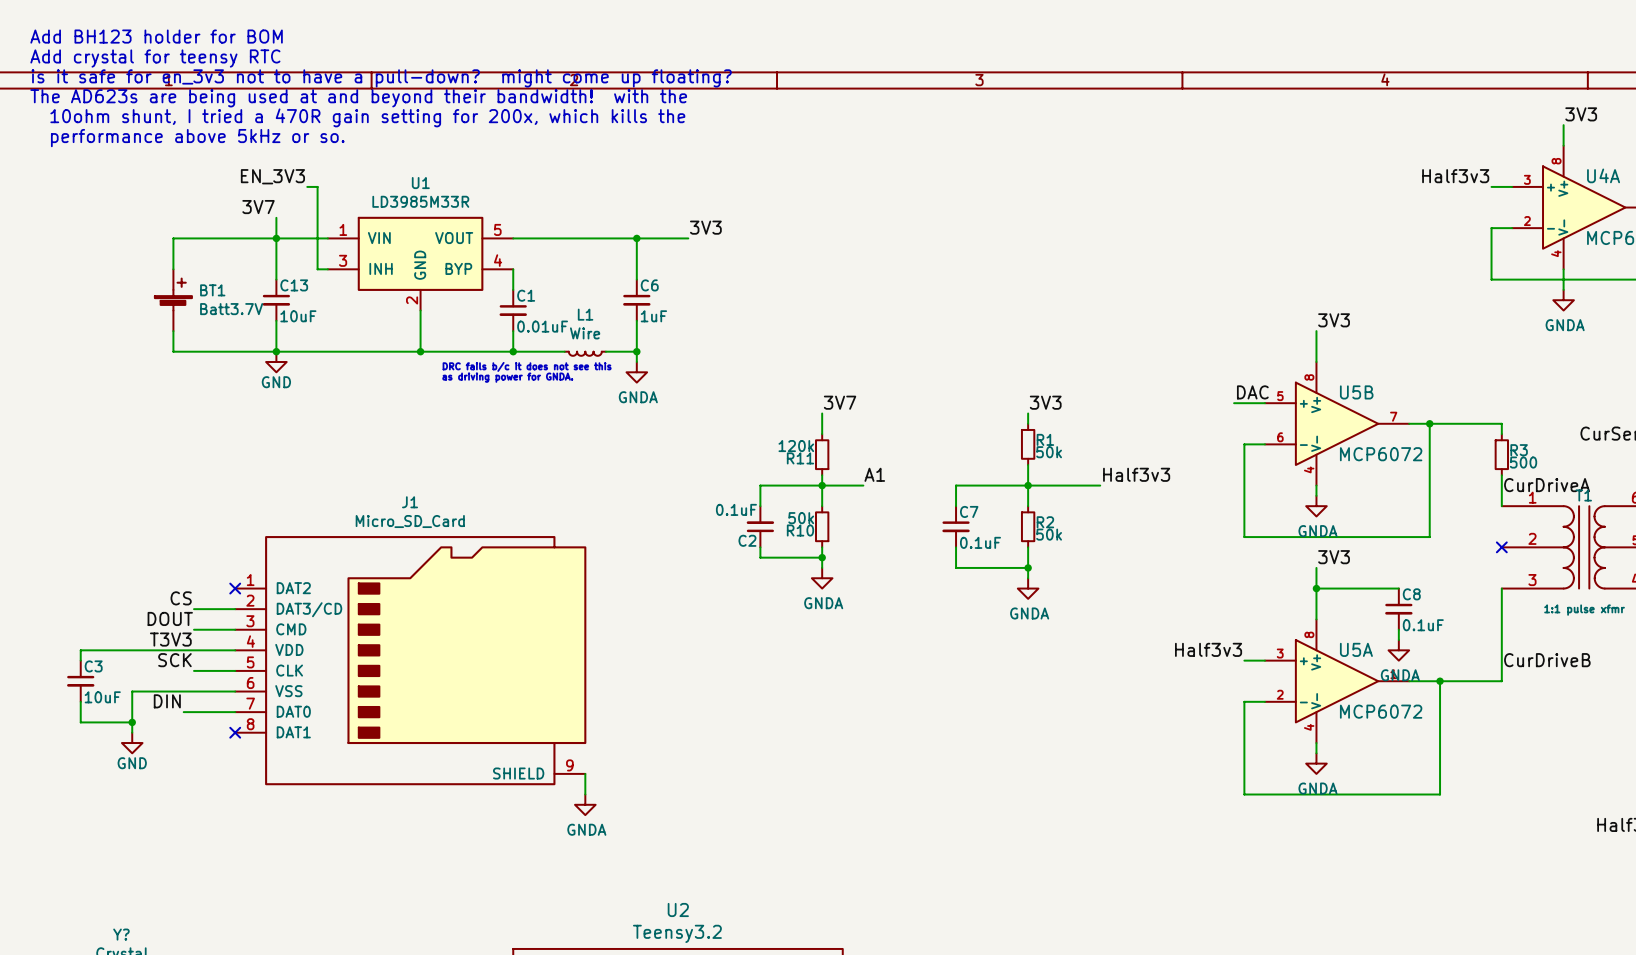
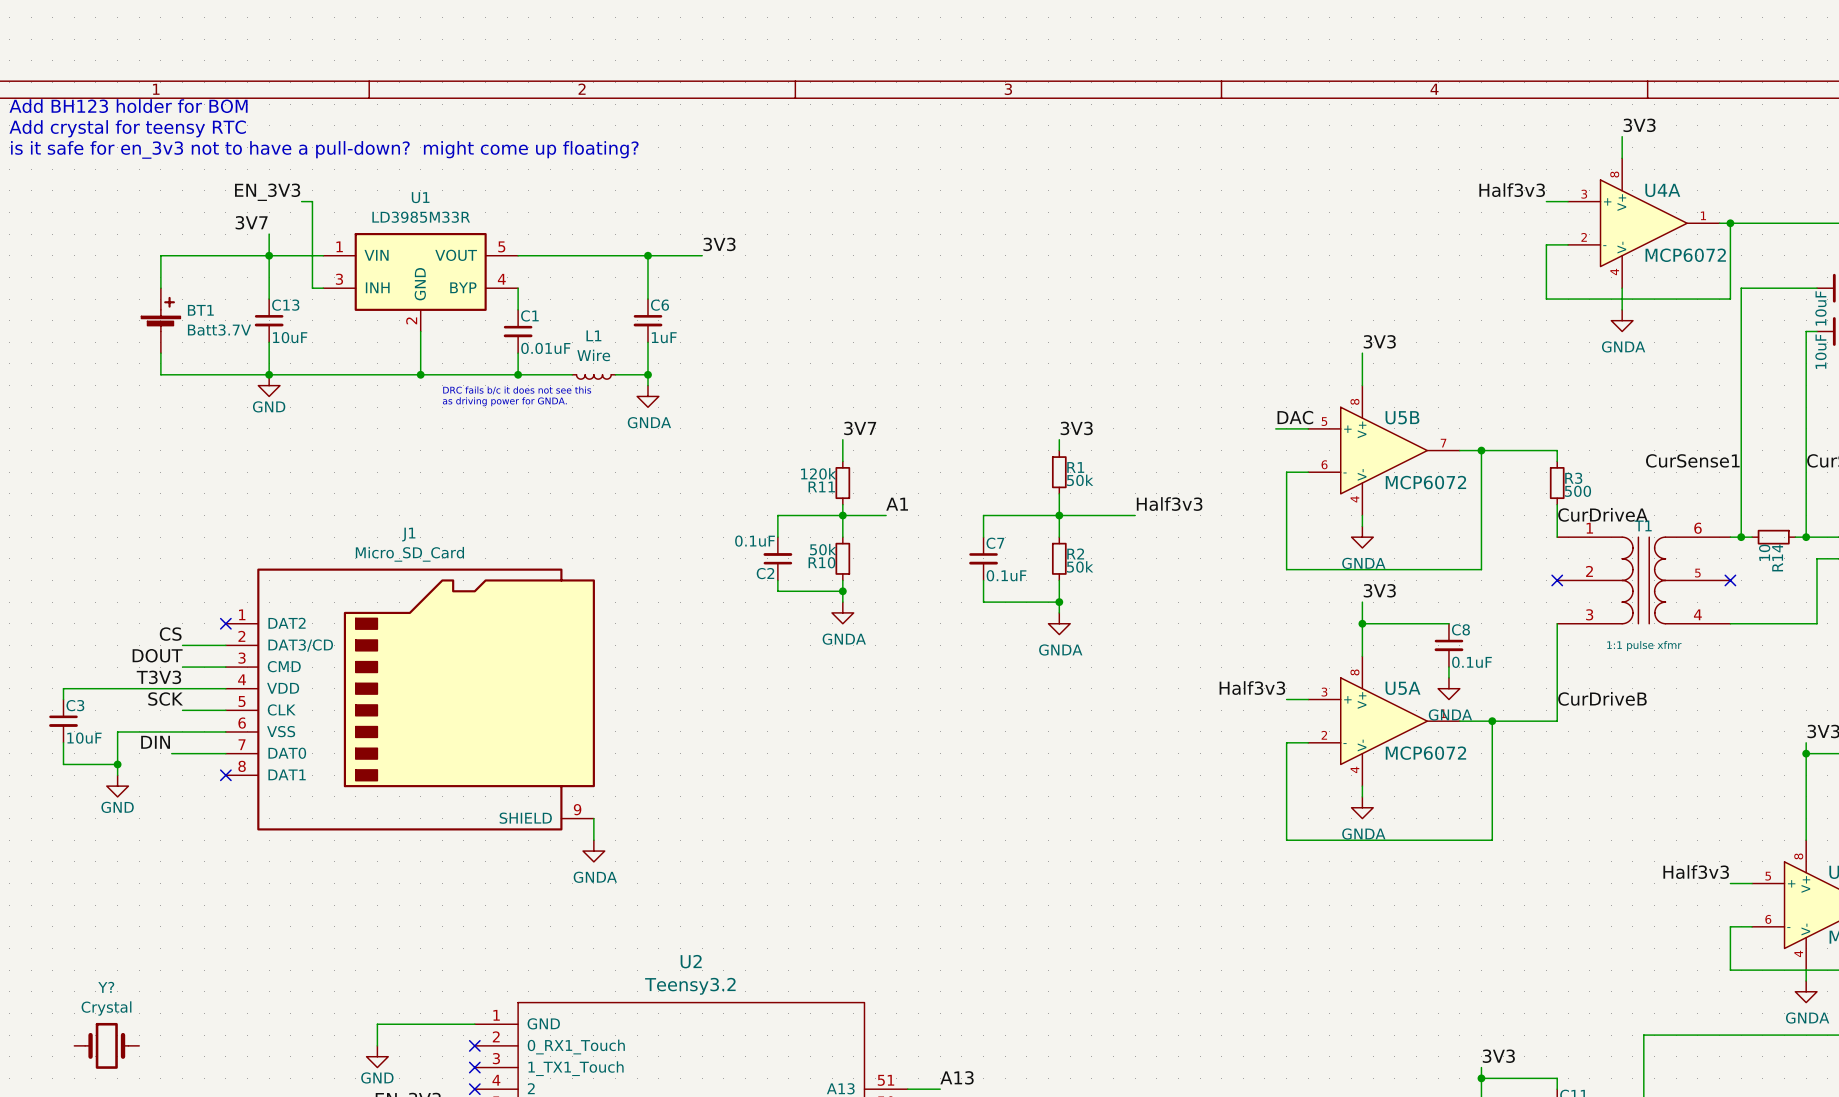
text: Add BH123 holder for BOM (156, 36) -> none
text: Add crystal for teensy RTC (155, 58) -> none
text: is it safe for en_3v3 not to have a pull-down? might come up floating? (381, 78) -> none
text: The AD623s are being used at and beyond their bandwidth! with the (358, 98) -> Add BH123 holder for BOM (128, 106)
text: 10ohm shunt, I tried a 470R gain setting for 200x, which kills the (367, 117) -> Add crystal for teensy RTC (127, 128)
text: performance above 5kHz or so. (197, 138) -> is it safe for en_3v3 not to have a pull-down? might come up floating? (324, 149)

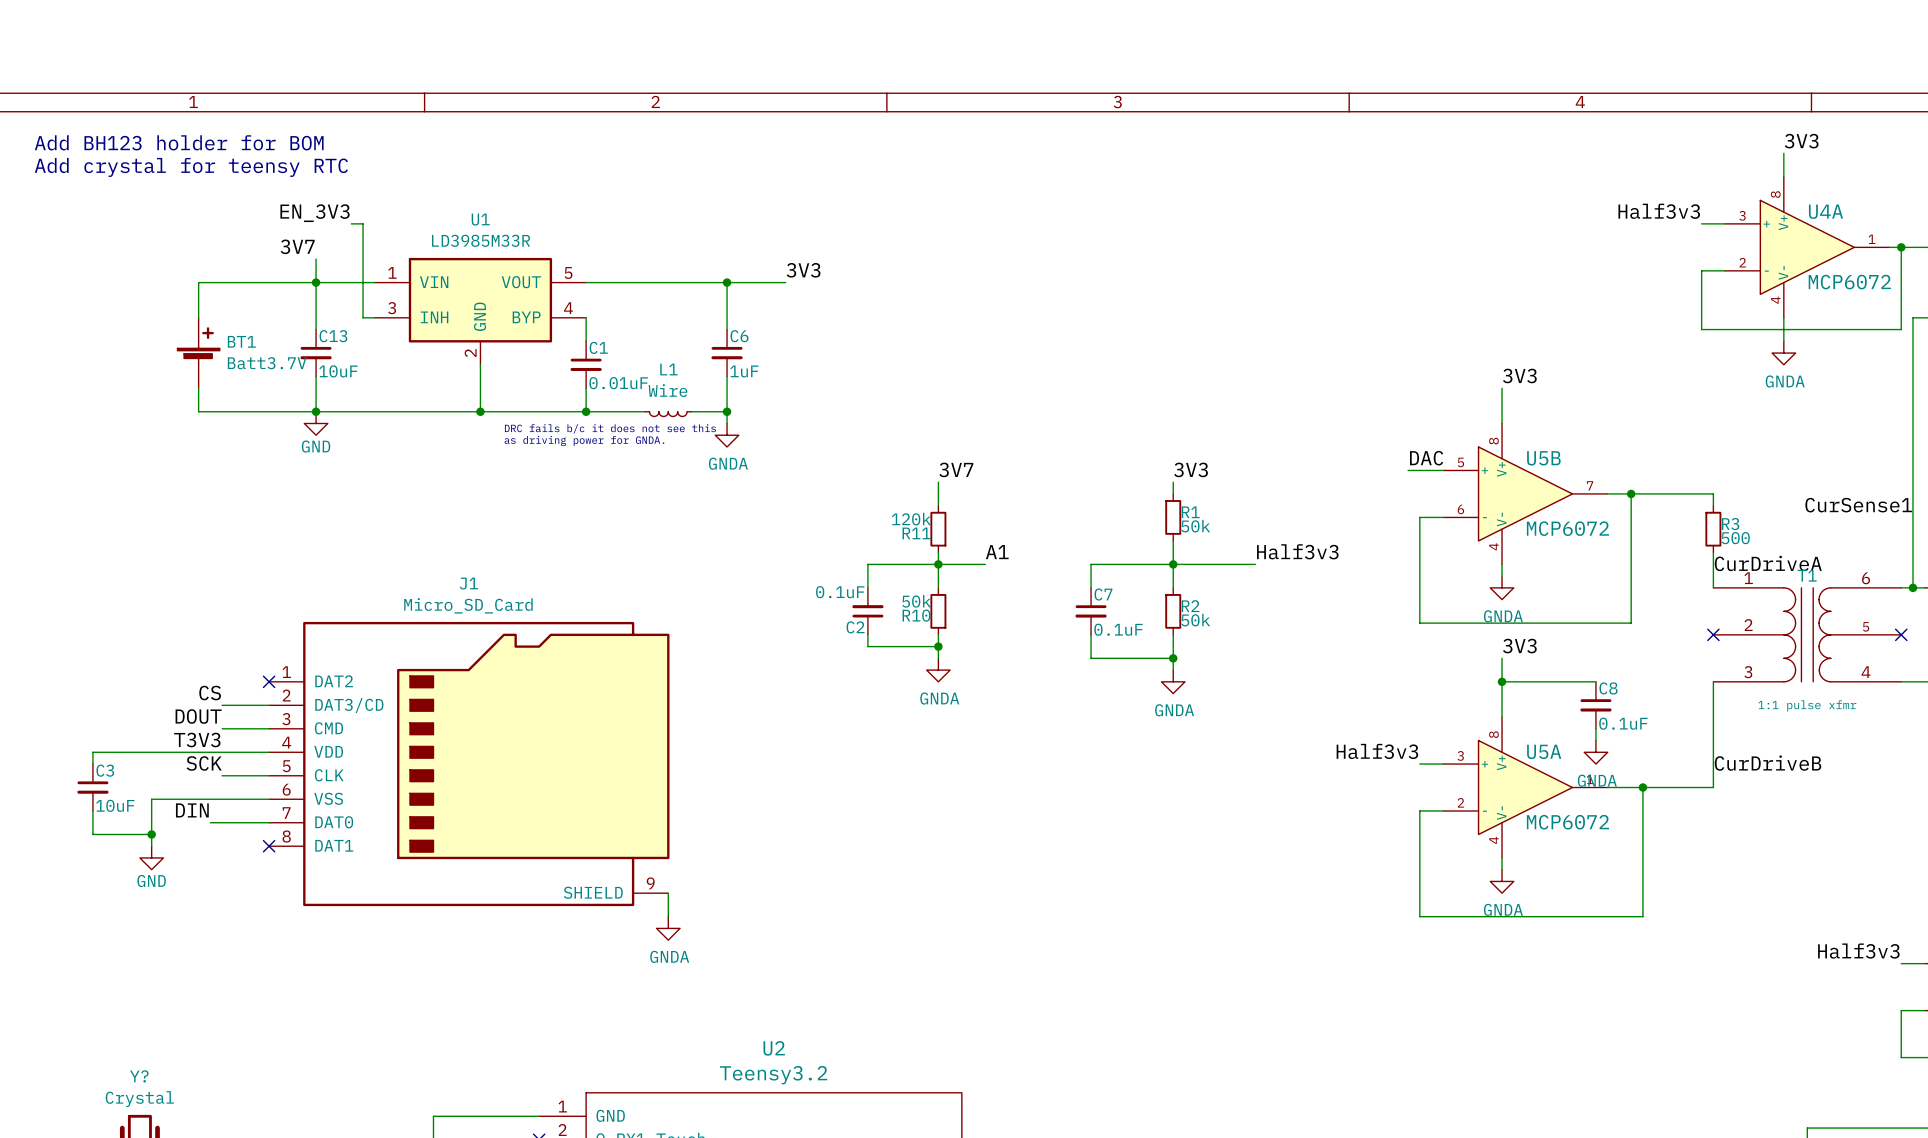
text: Add BH123 holder for BOM (128, 106) -> none
text: Add crystal for teensy RTC (127, 128) -> Add BH123 holder for BOM (179, 142)
text: is it safe for en_3v3 not to have a pull-down? might come up floating? (324, 149) -> Add crystal for teensy RTC (191, 167)

